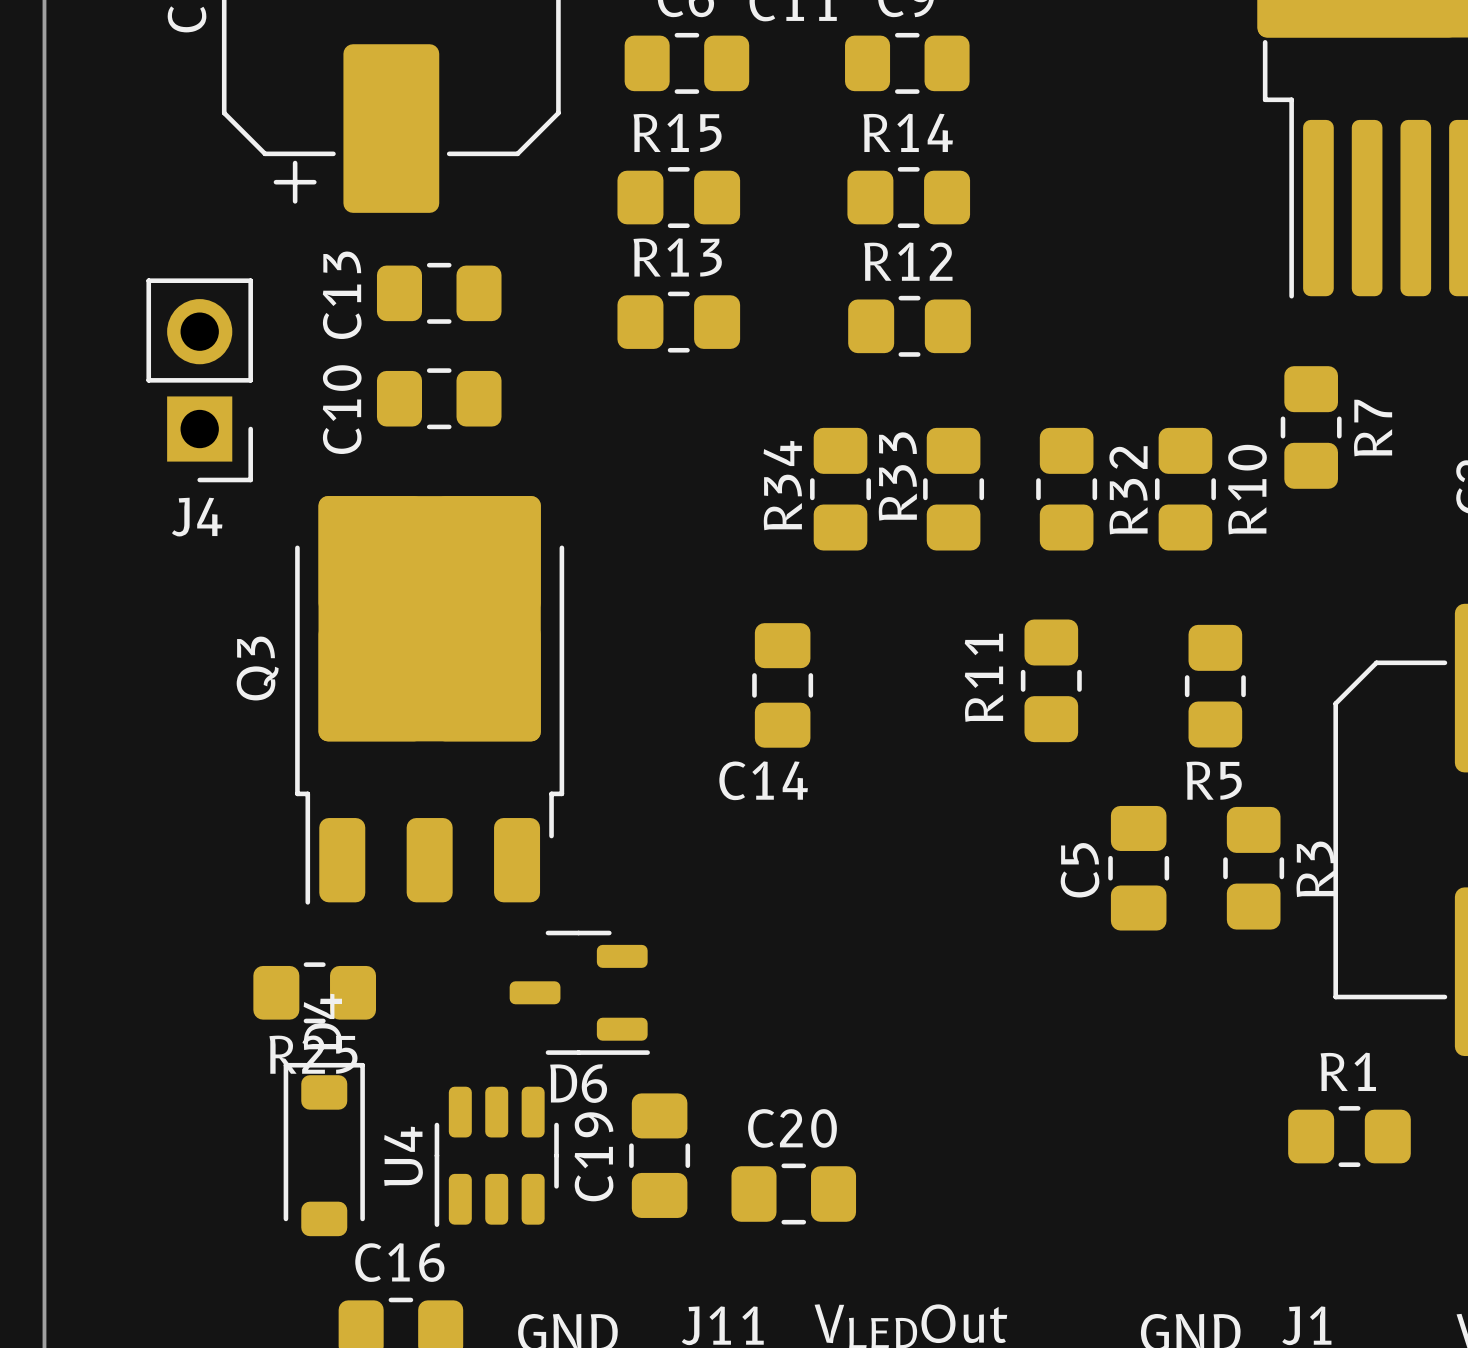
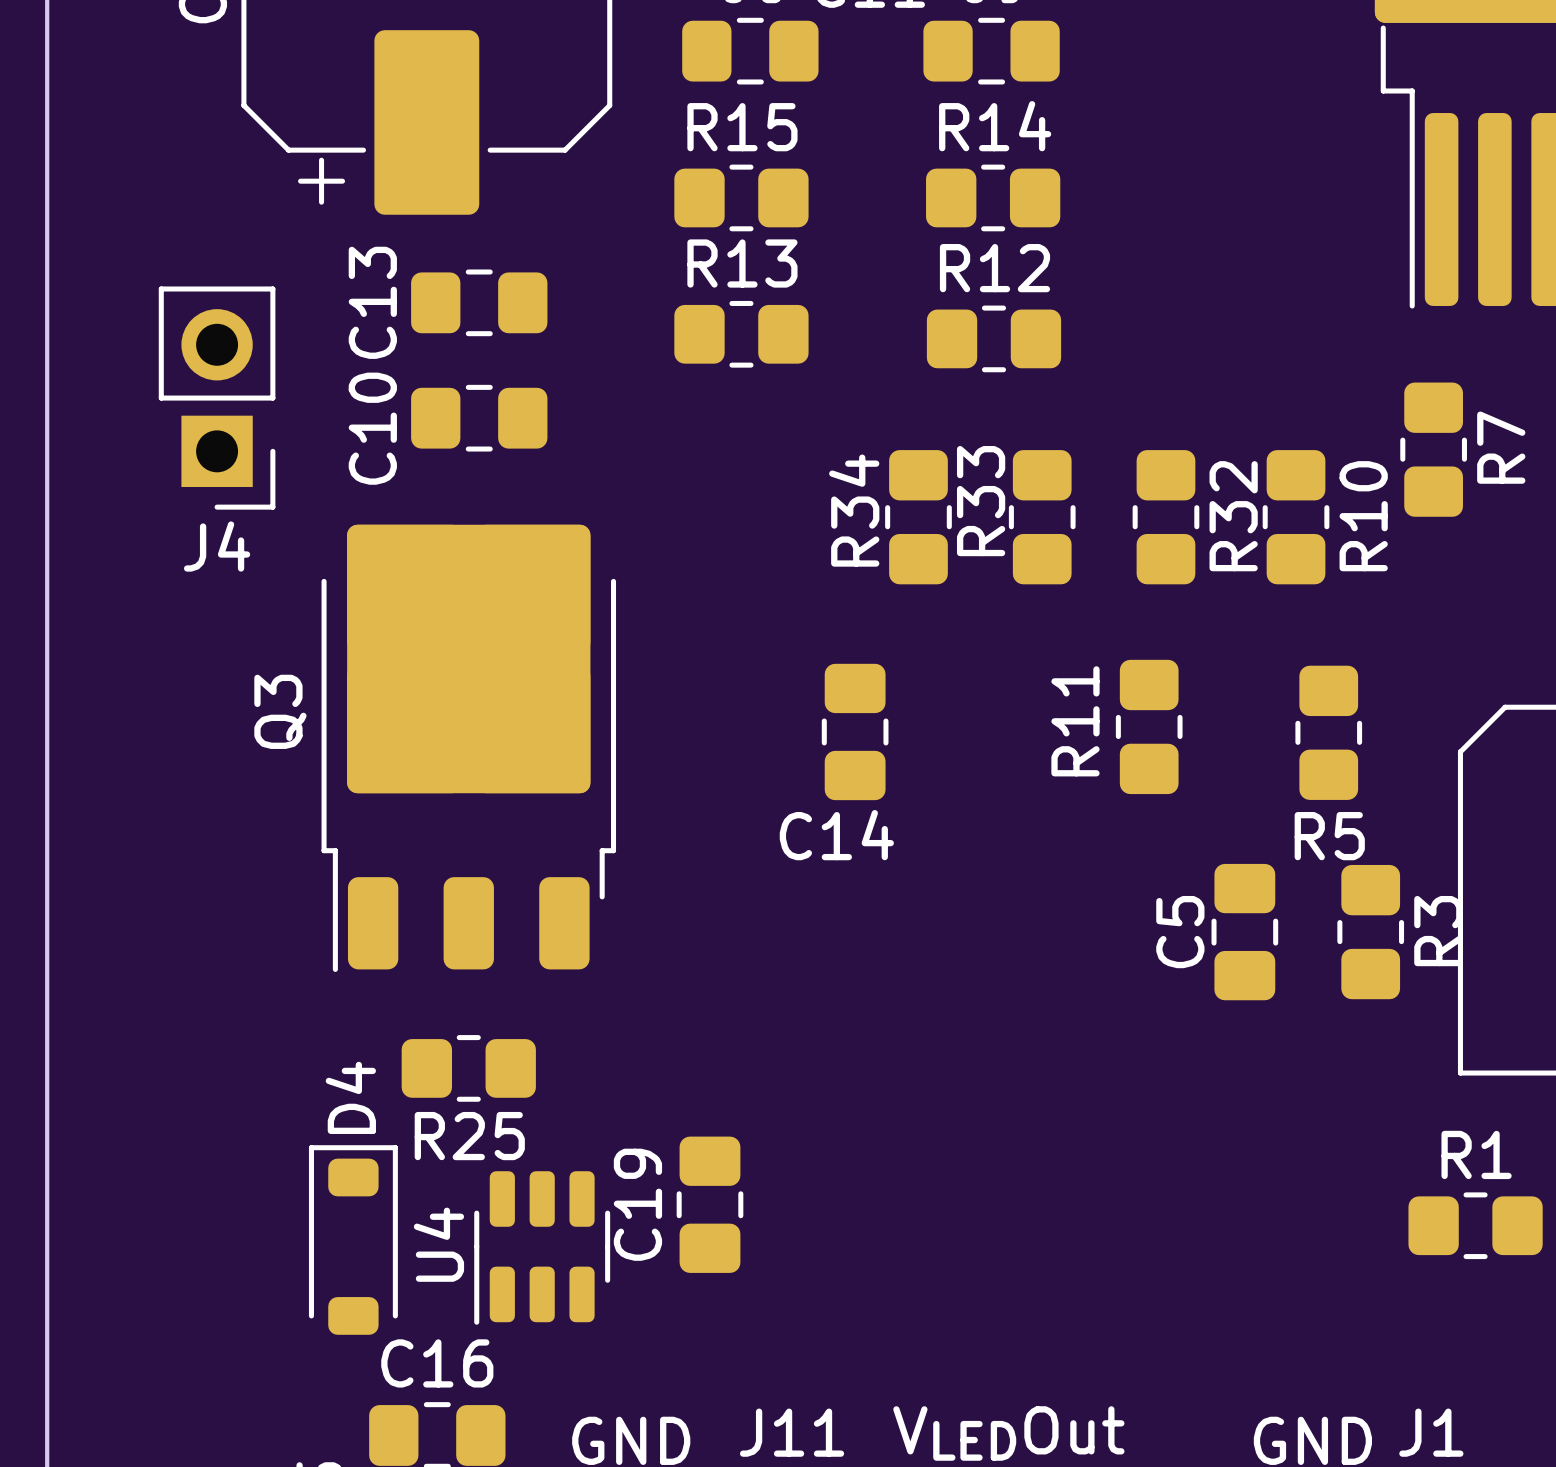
R25 position: (314, 992) -> (468, 1068)
D6: (579, 992) -> none
C19 position: (659, 1155) -> (709, 1204)
C20: (793, 1194) -> none

